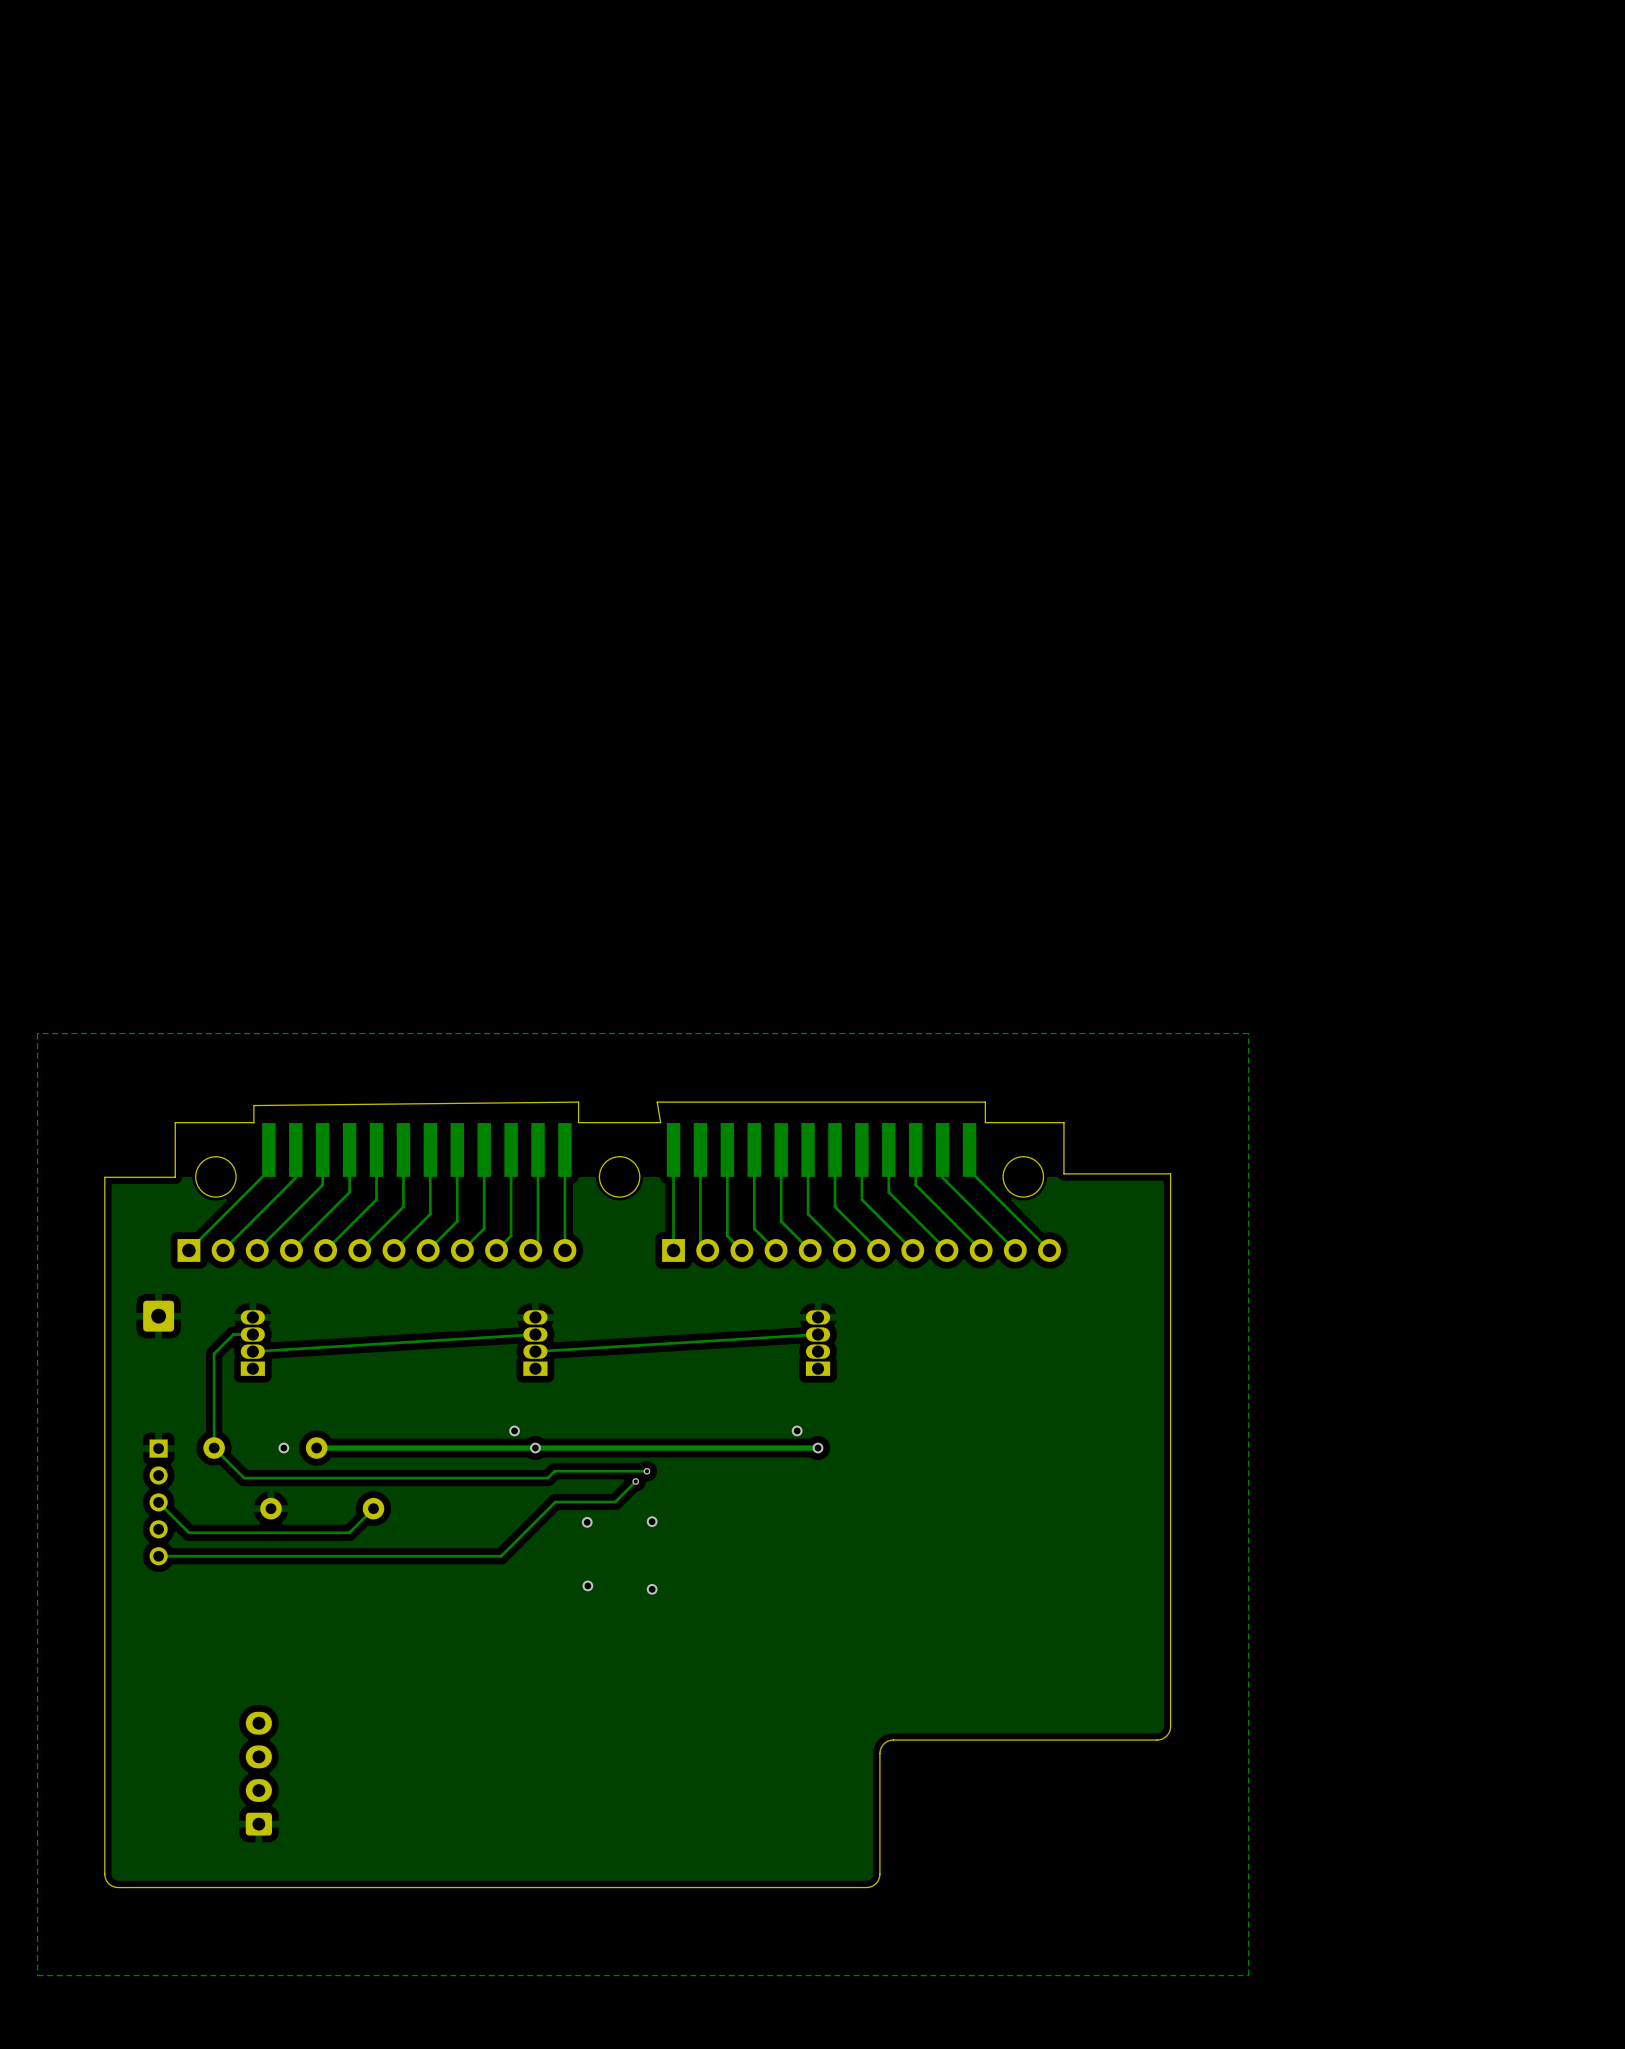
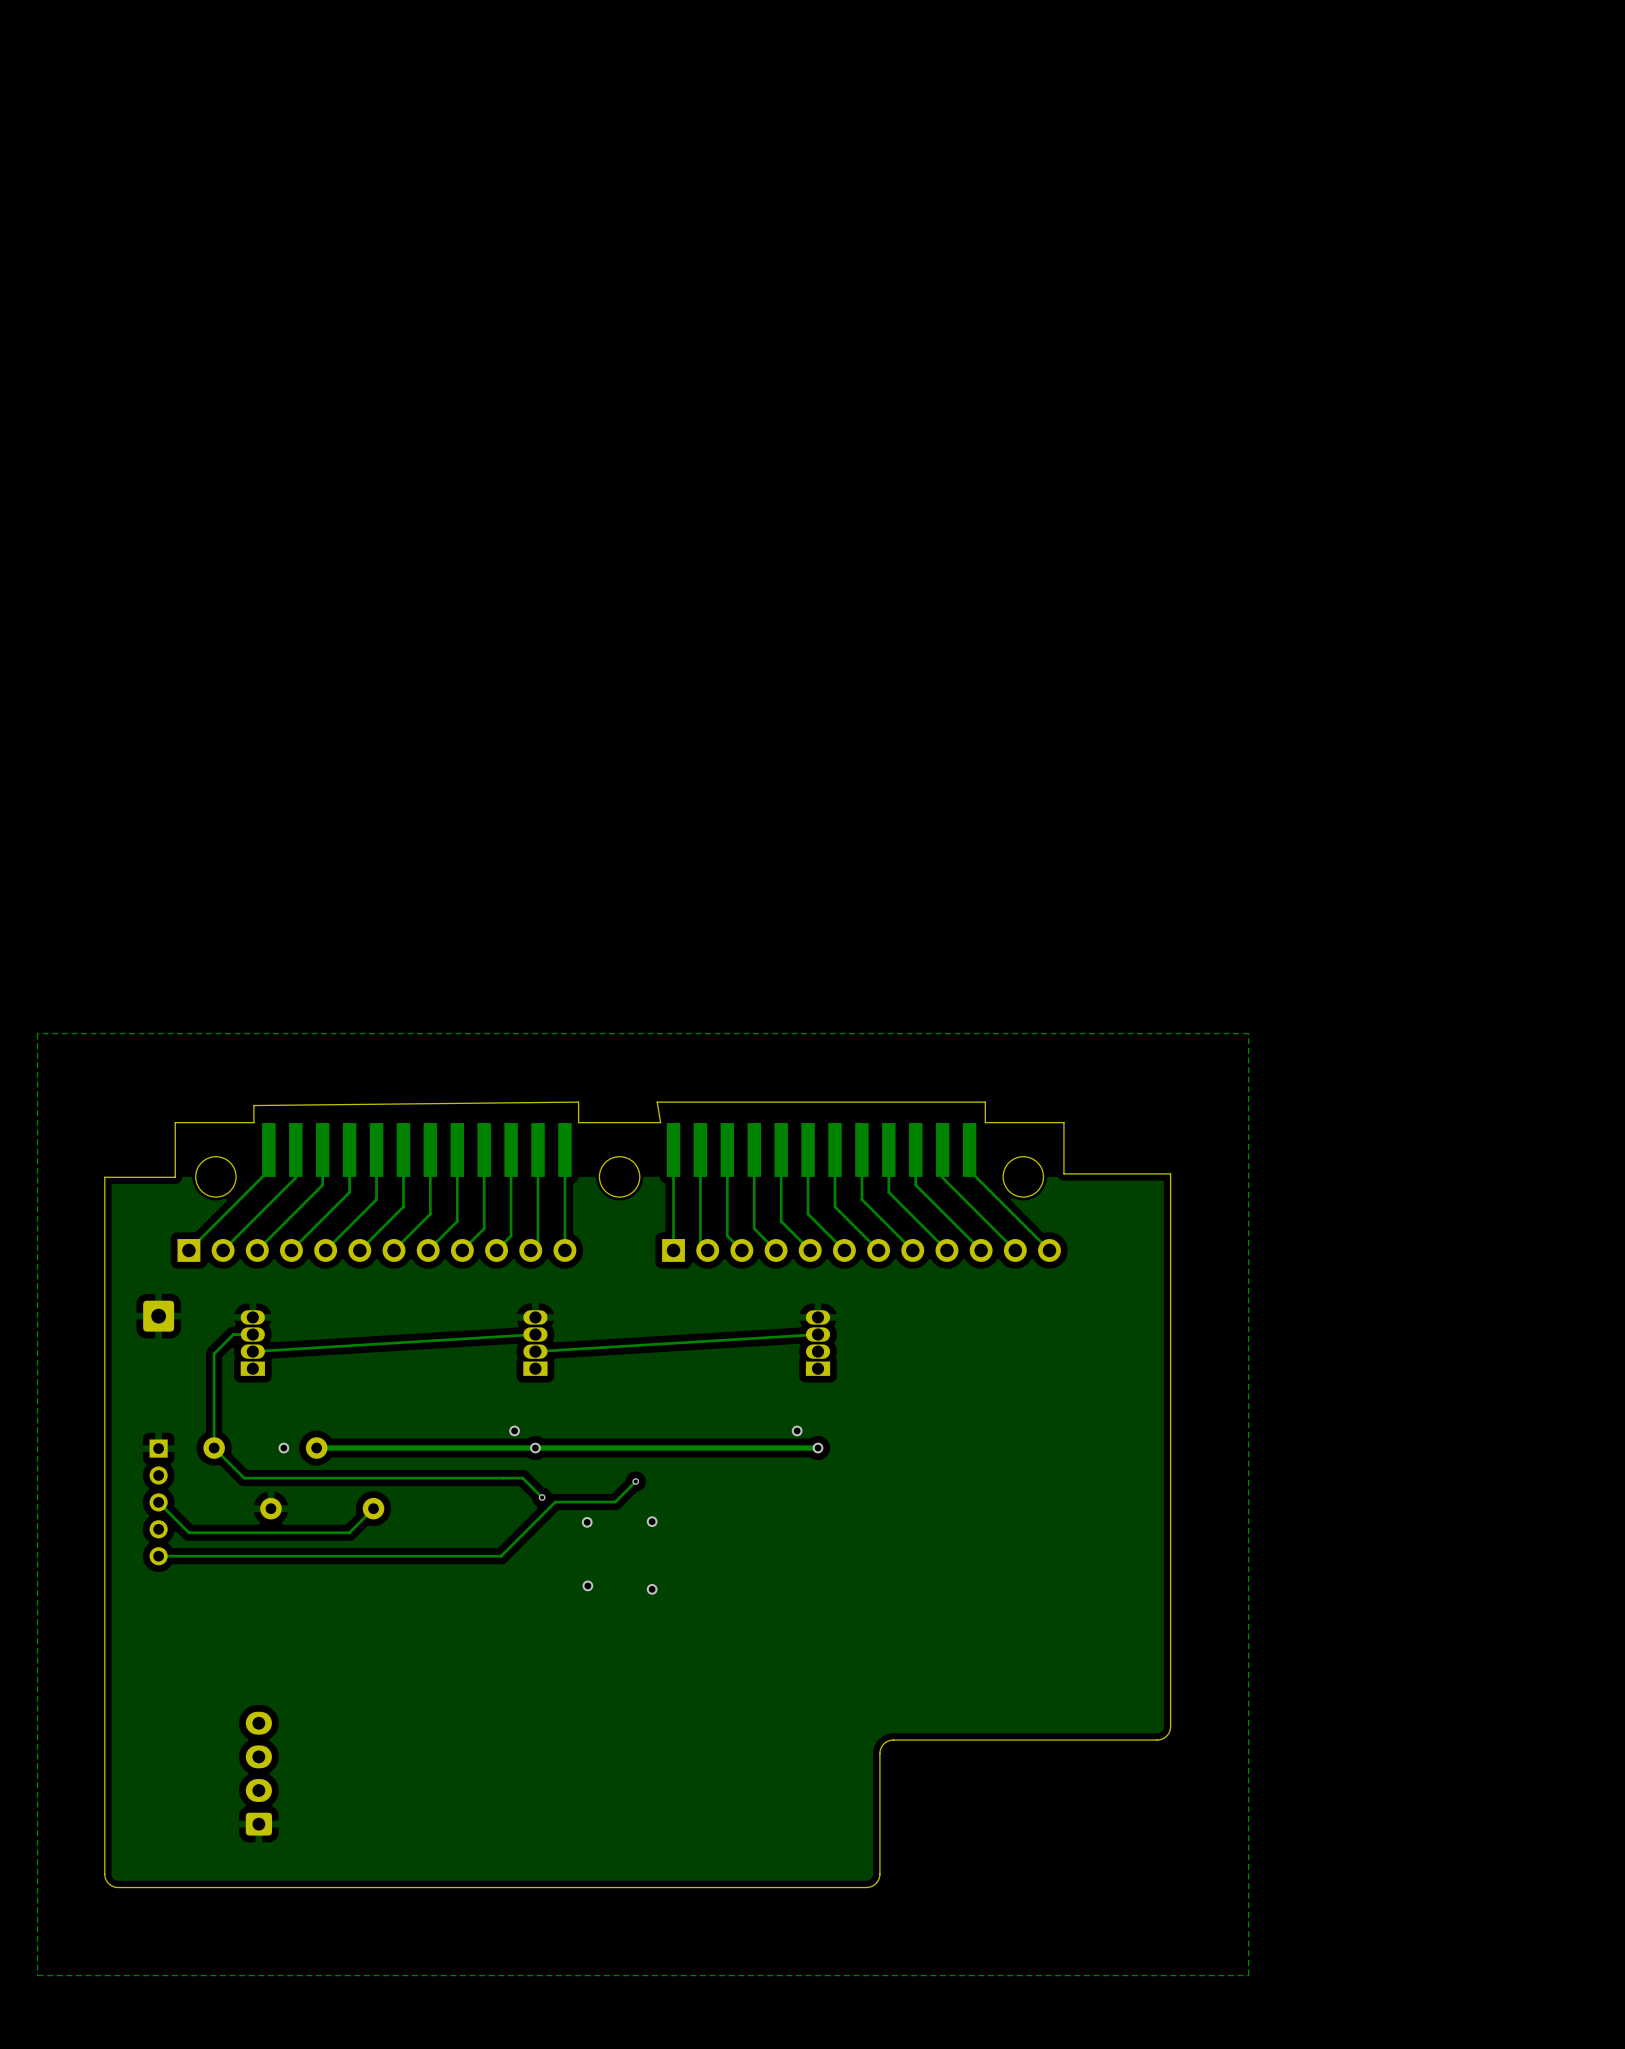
track: (646, 1471) (554, 1471) (547, 1478) (522, 1478) -> (542, 1497) (522, 1478)
via: (646, 1471) -> none
via: none -> (542, 1497)

